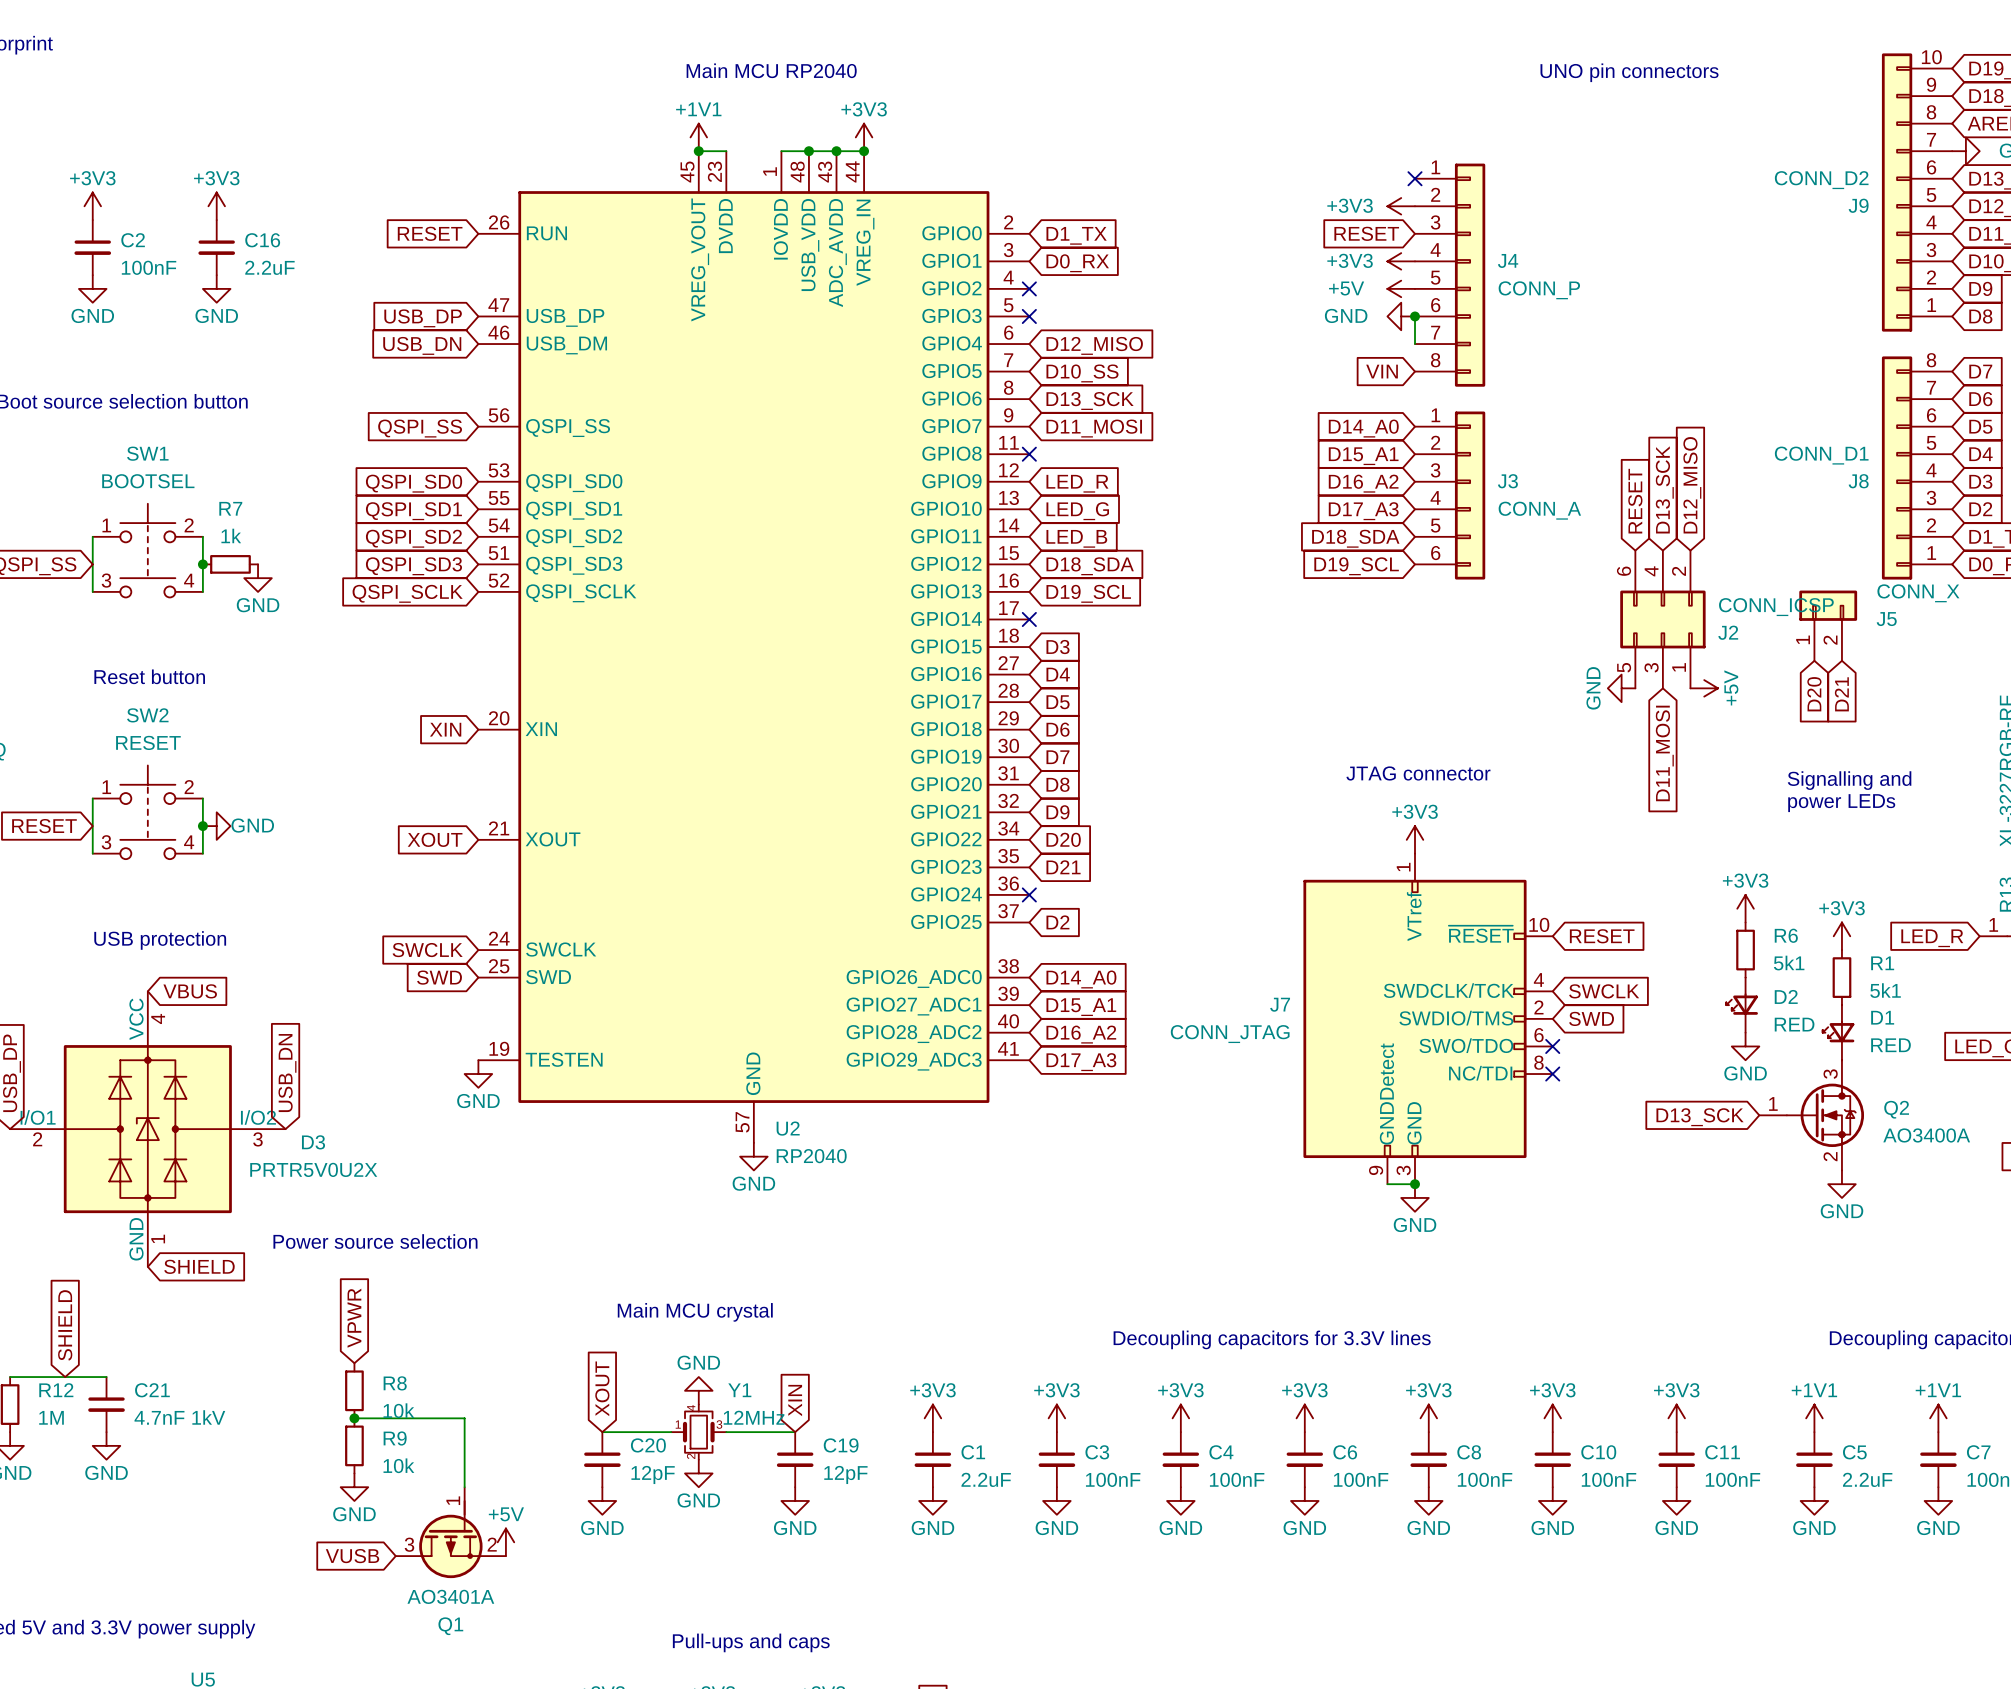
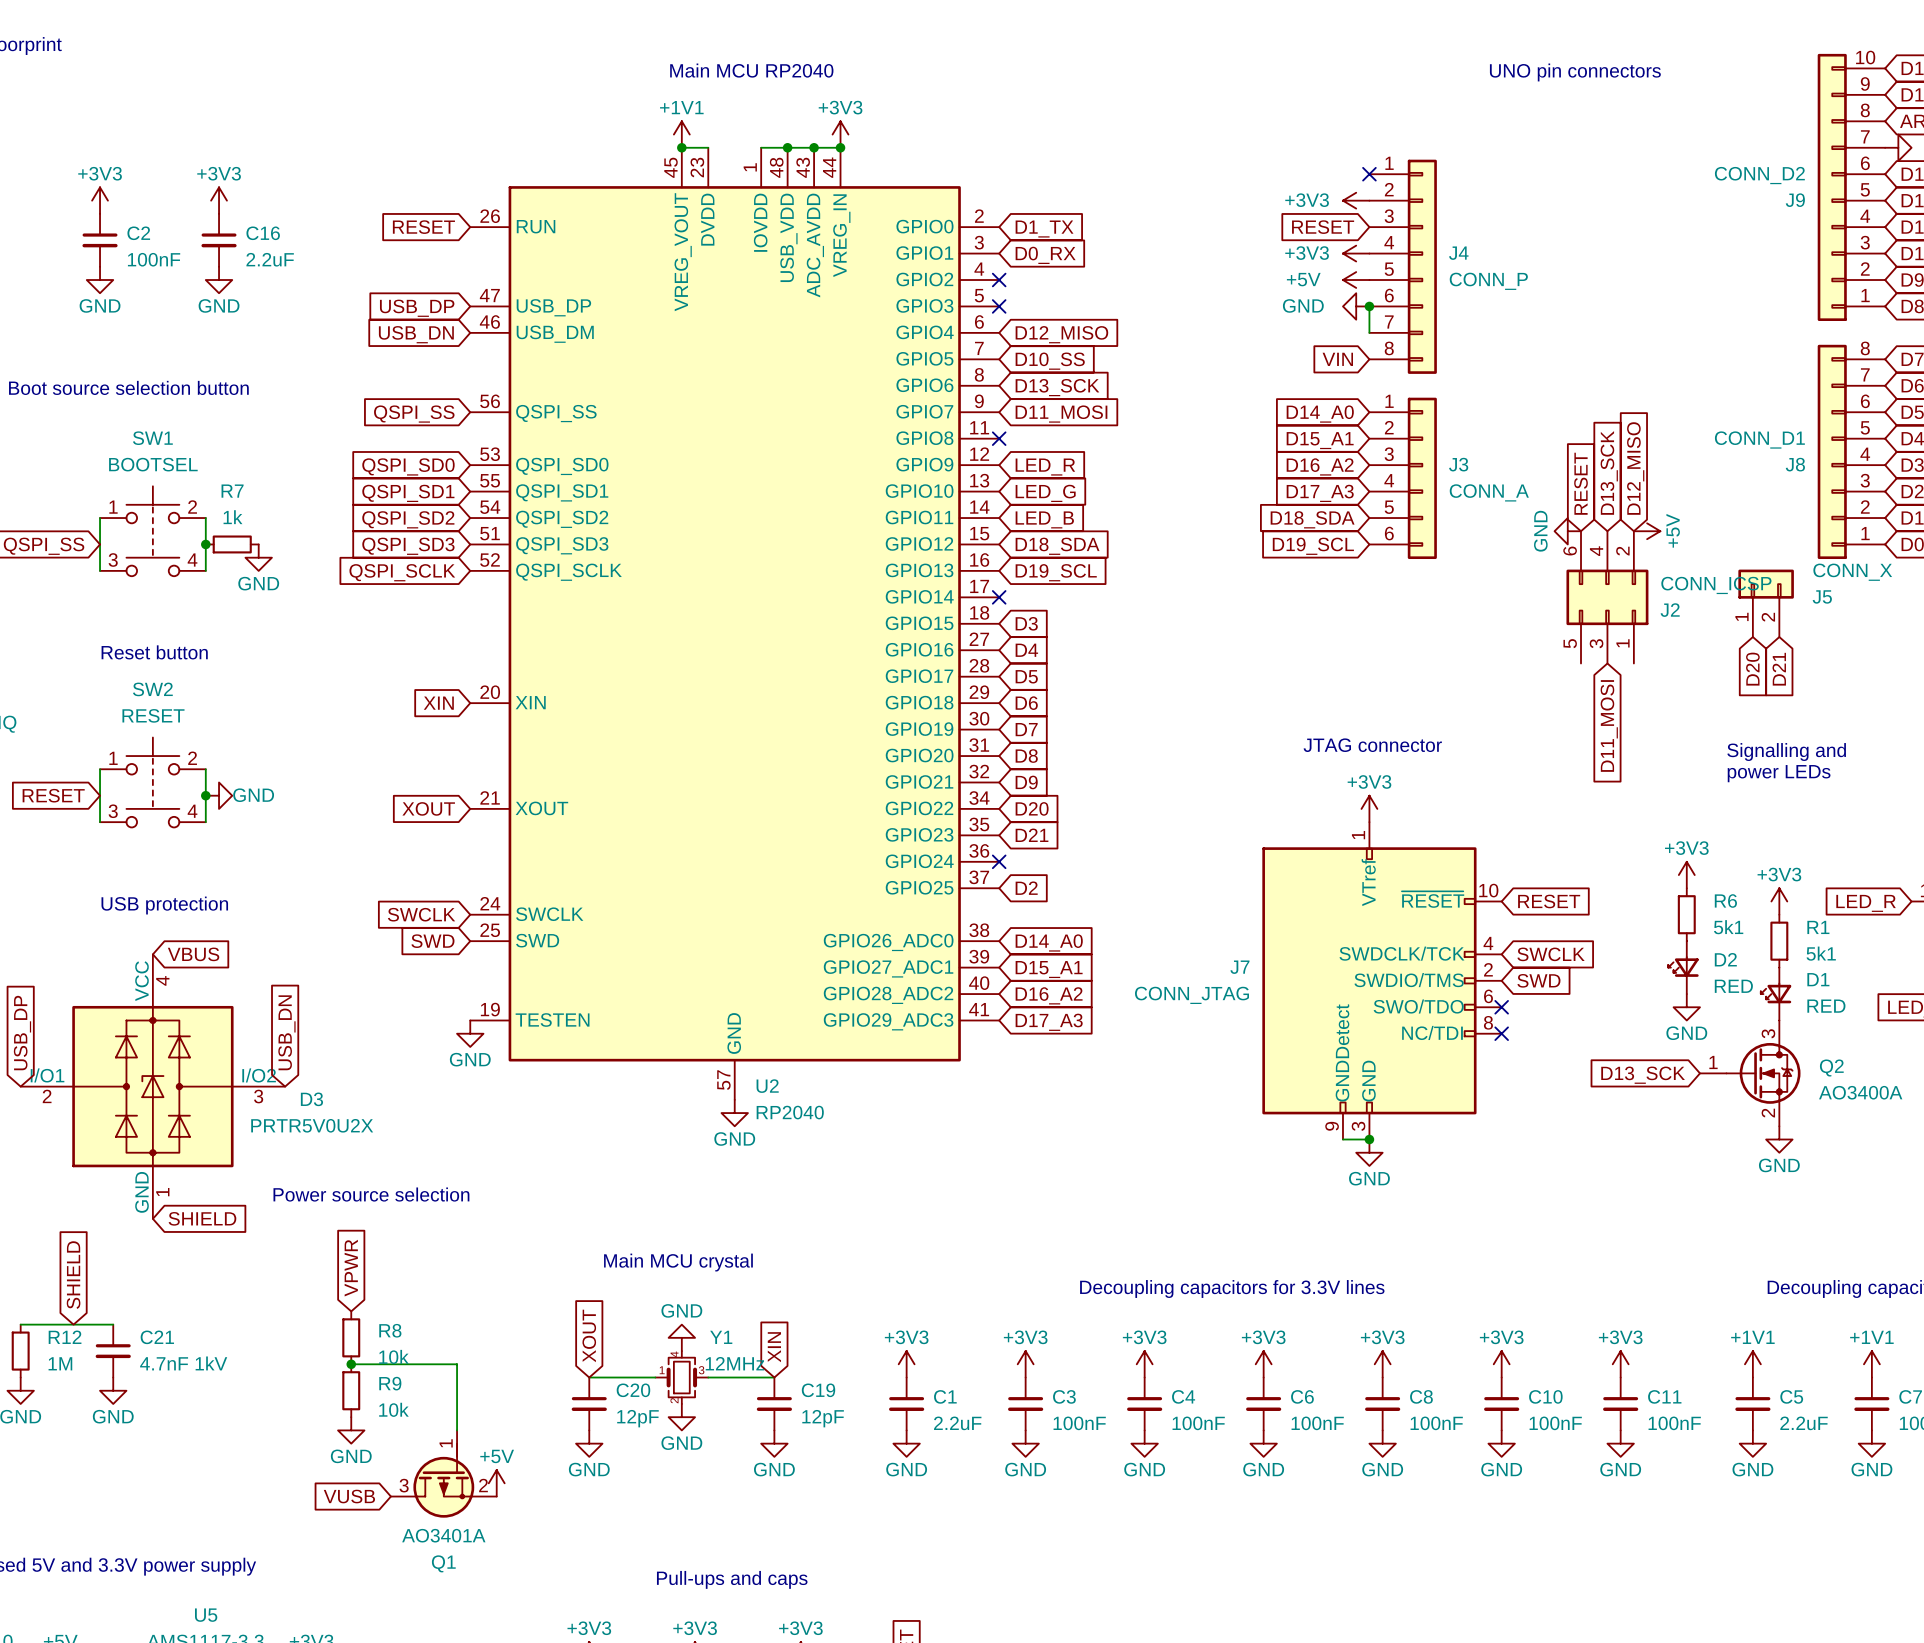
power symbol position: GND (1621, 688) -> GND (1567, 531)
power symbol position: +5V (1704, 688) -> +5V (1647, 531)

